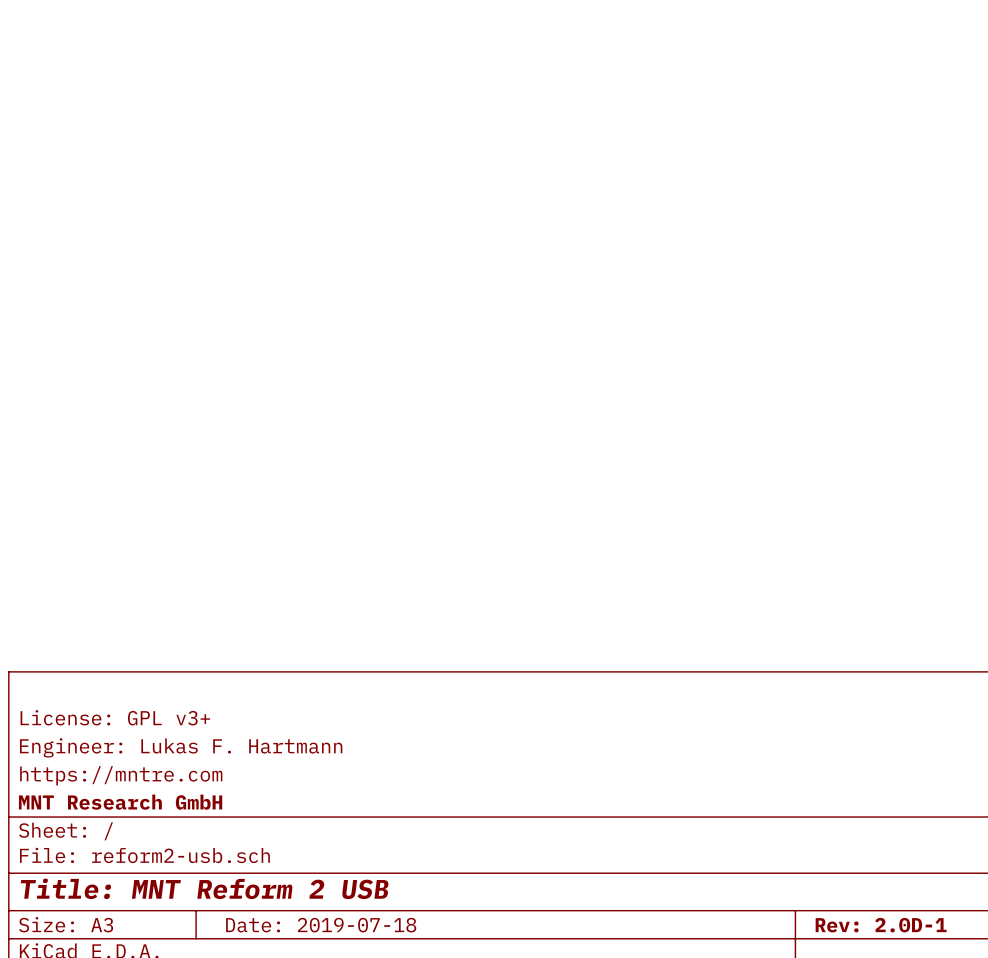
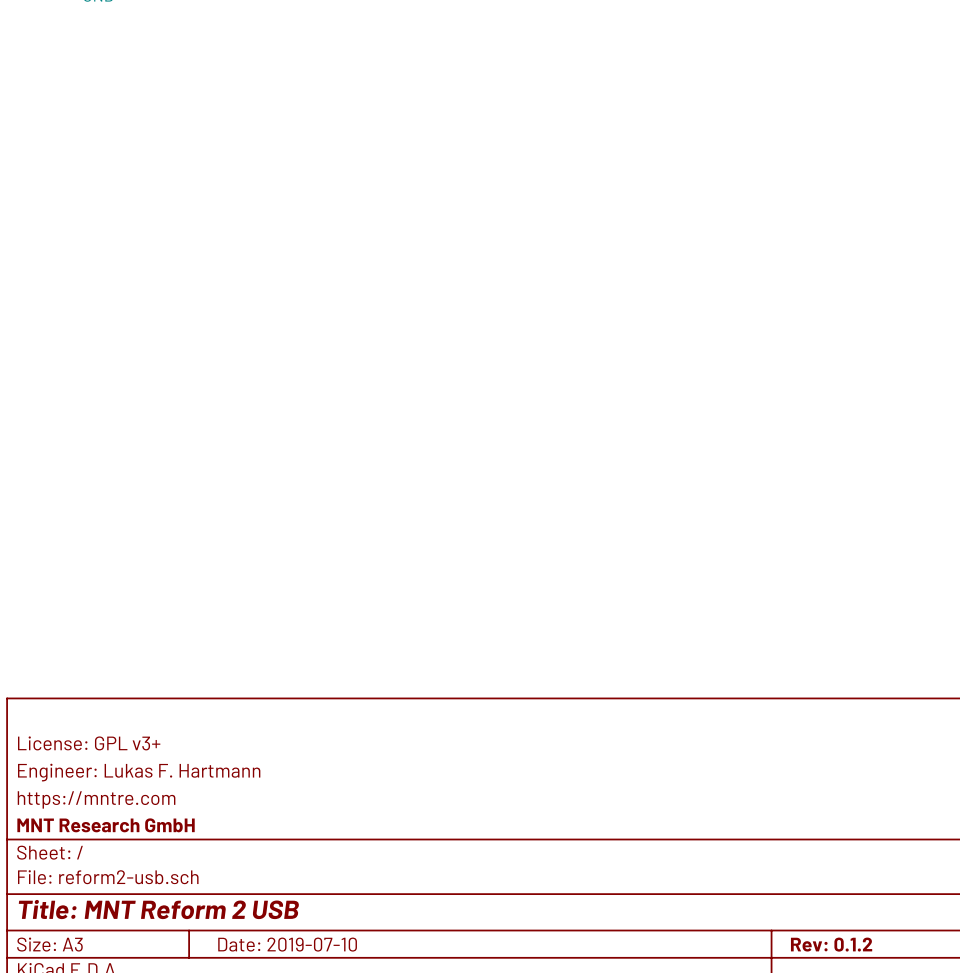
title block: Date: 2019-07-18 (321, 925) -> Date: 2019-07-10 (287, 944)
title block: Rev: 2.0D-1 (881, 925) -> Rev: 0.1.2 (831, 944)

